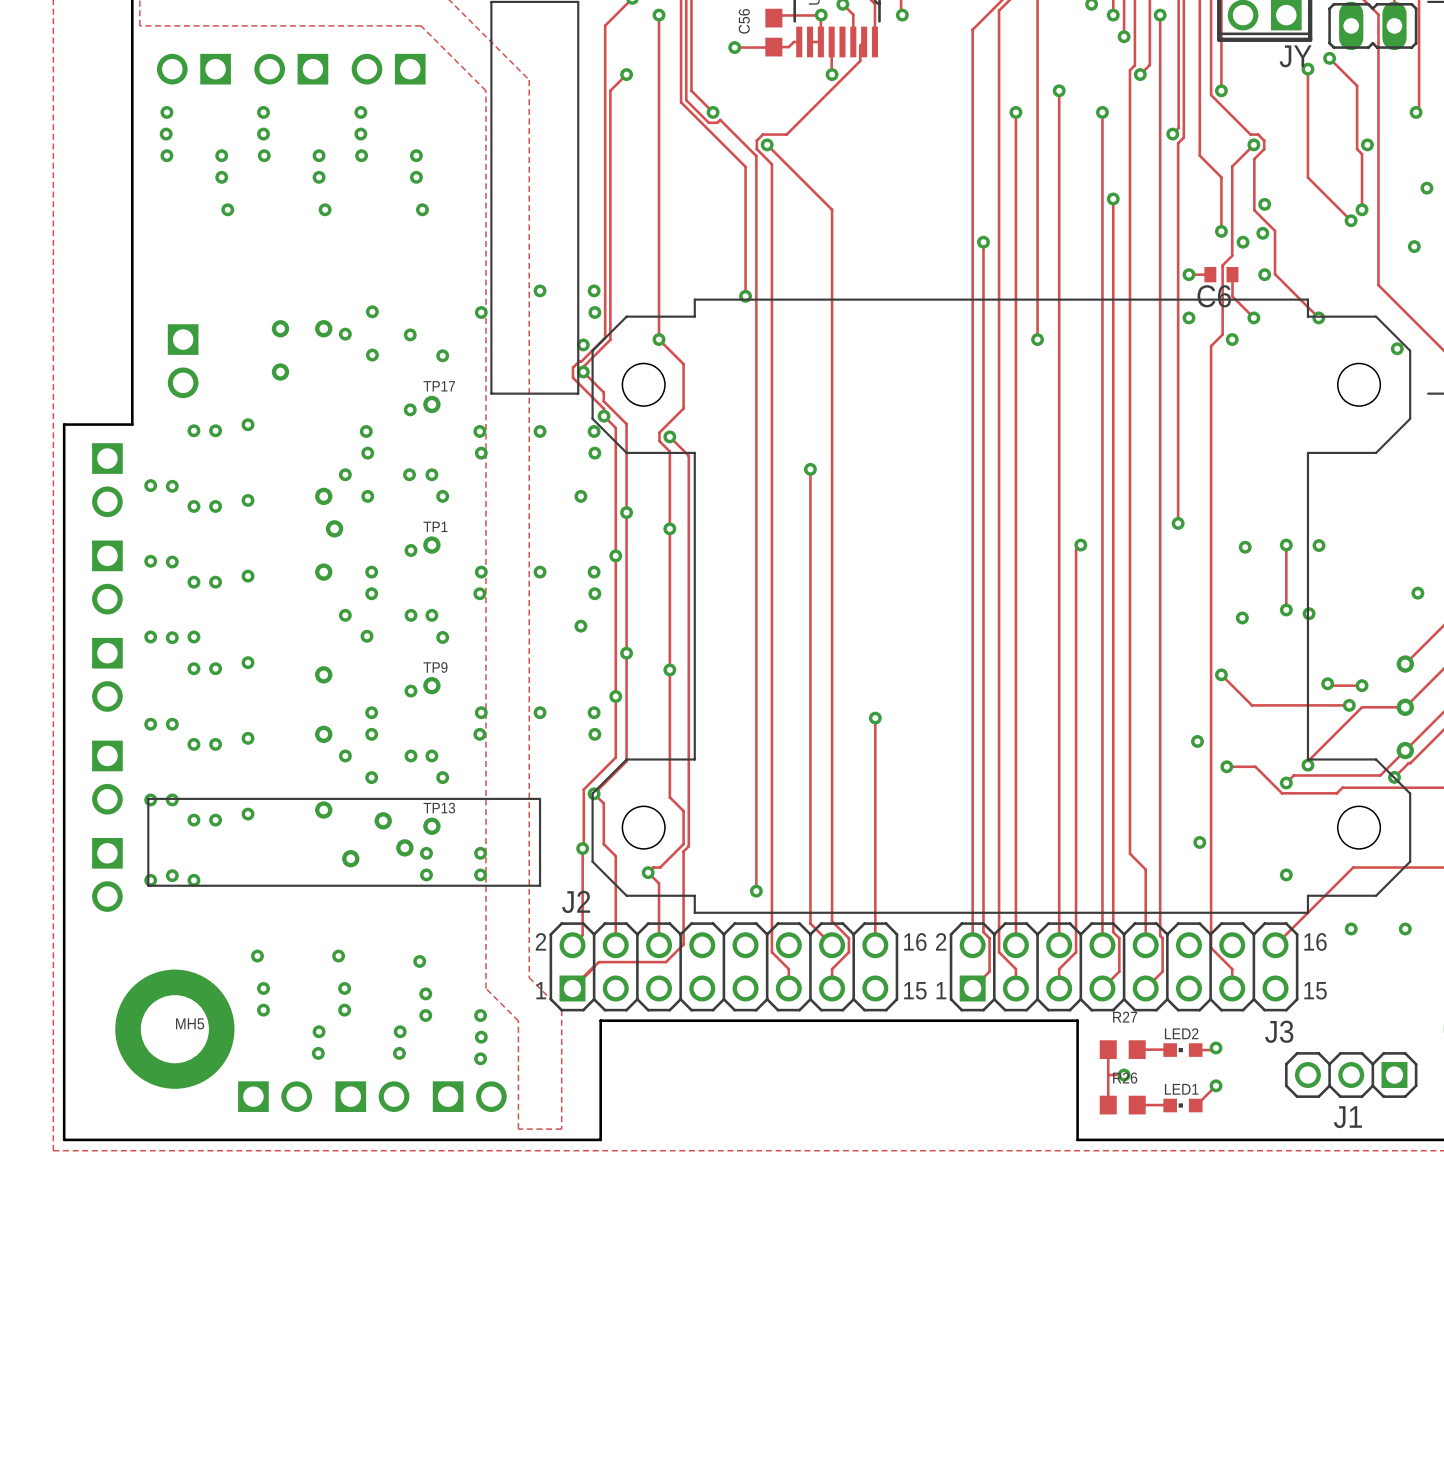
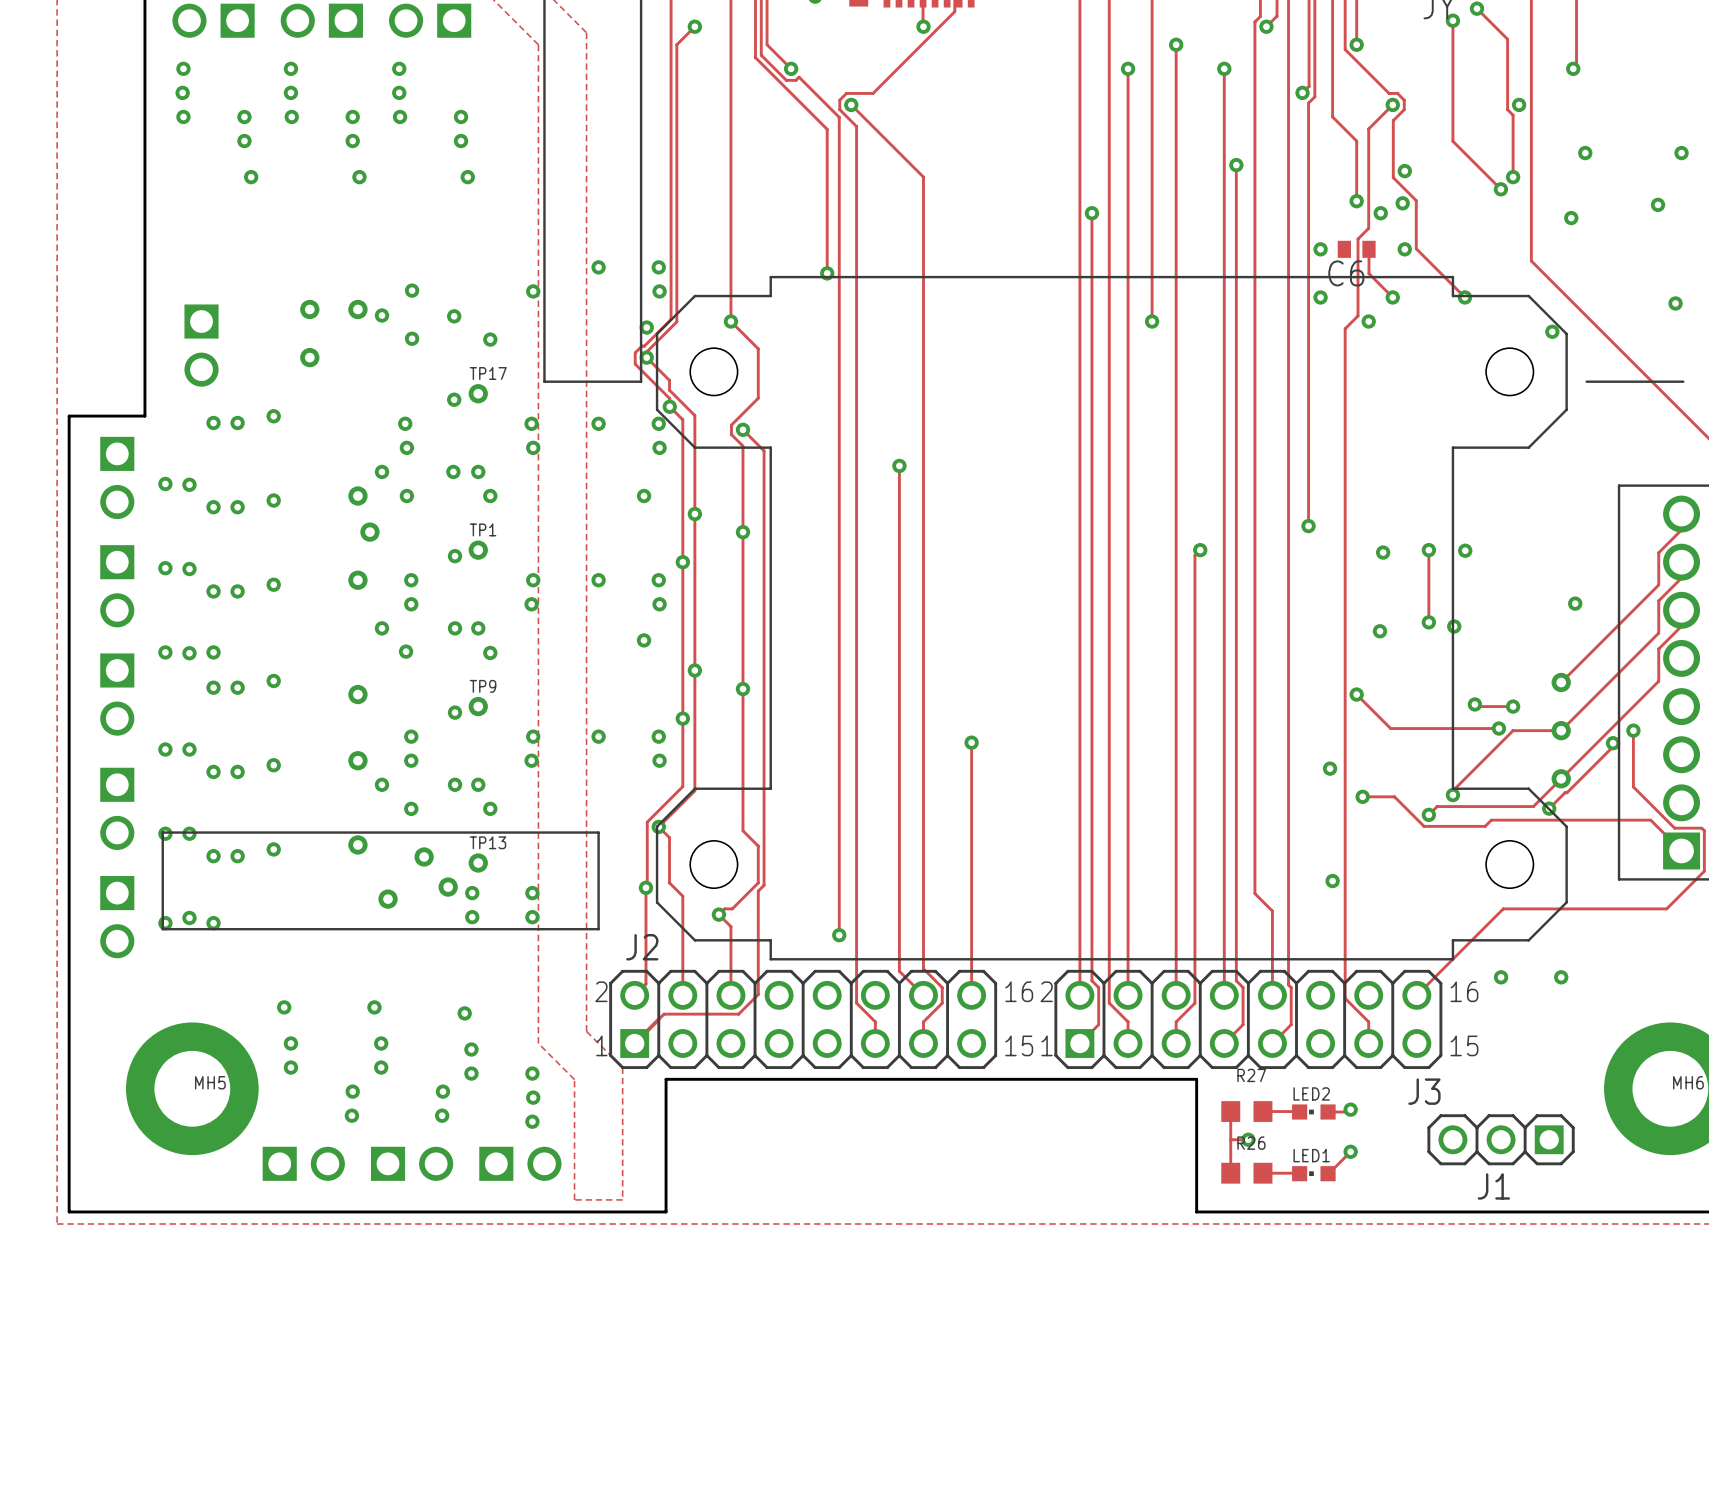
track: (1188, 274) (1210, 274) -> none
via: (1286, 874) -> none

